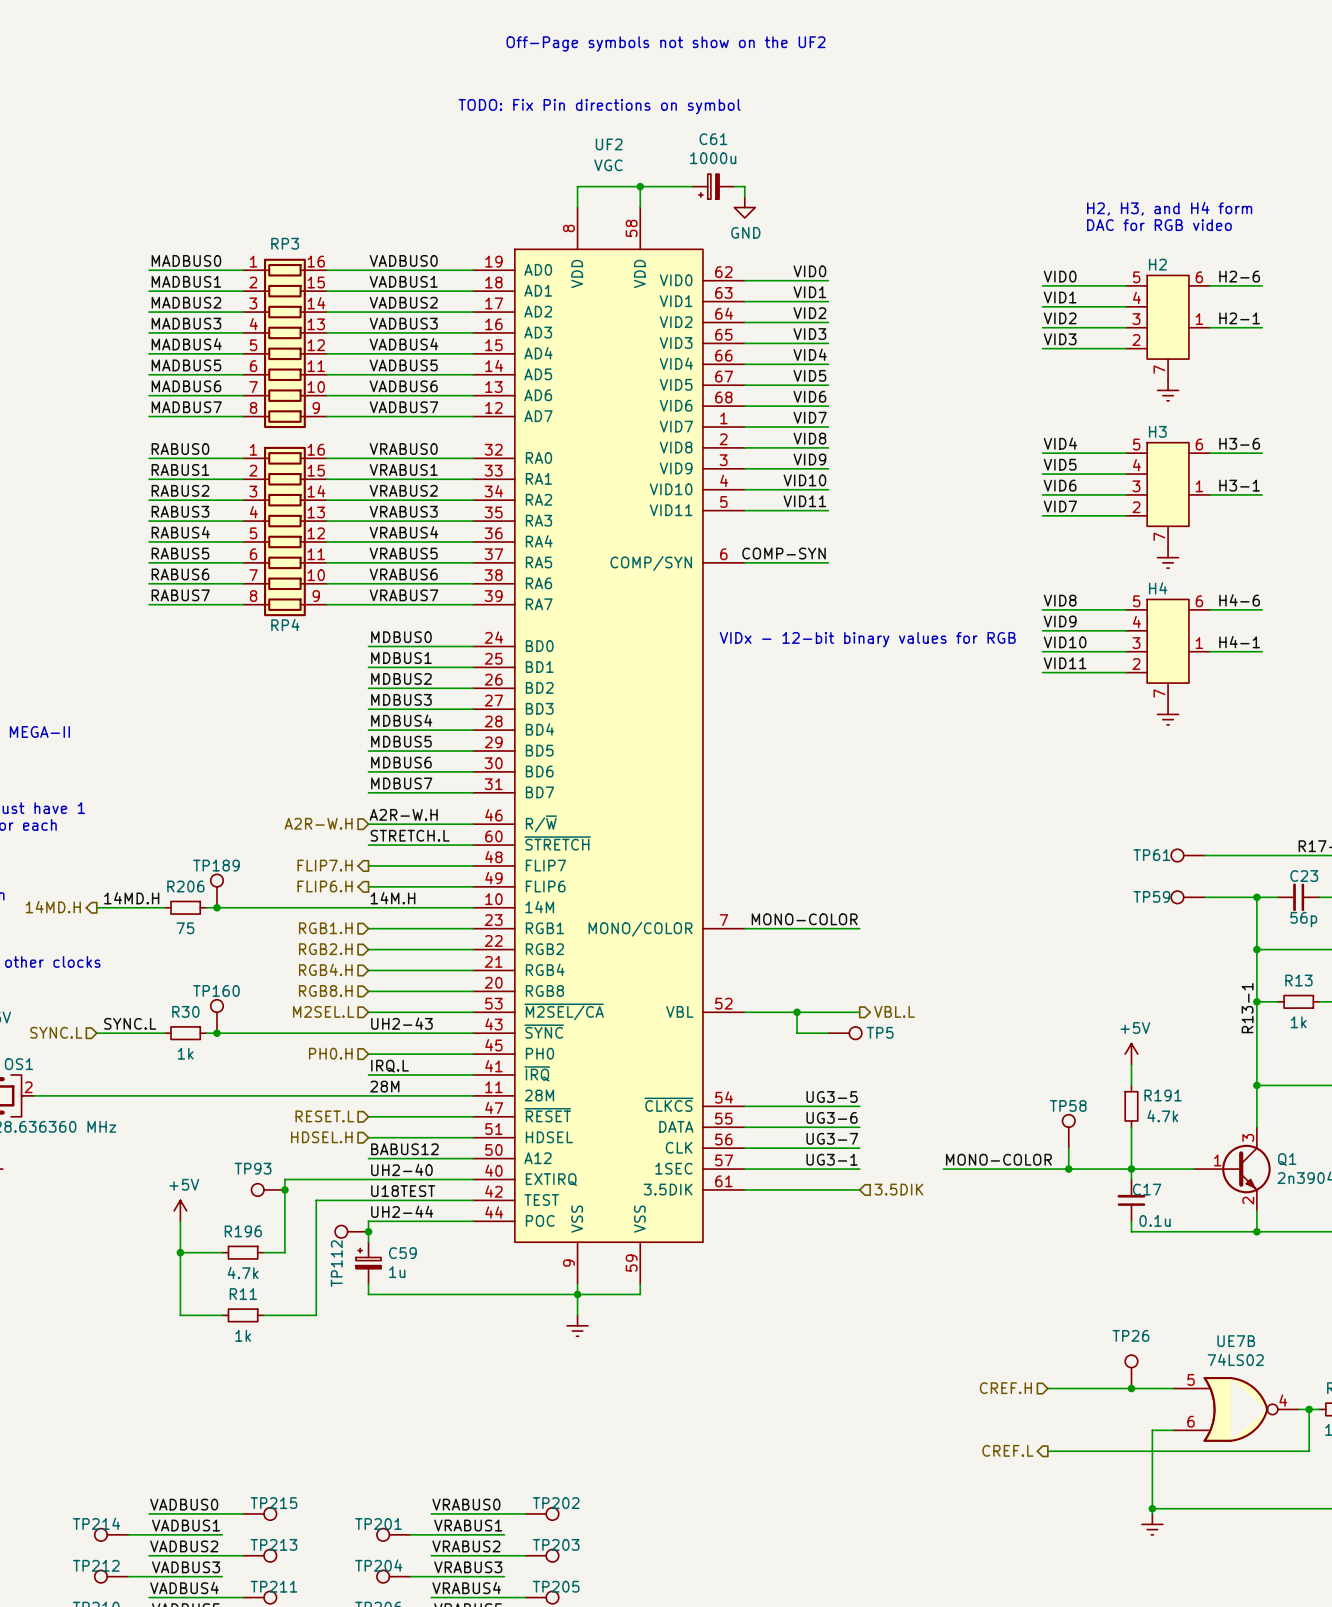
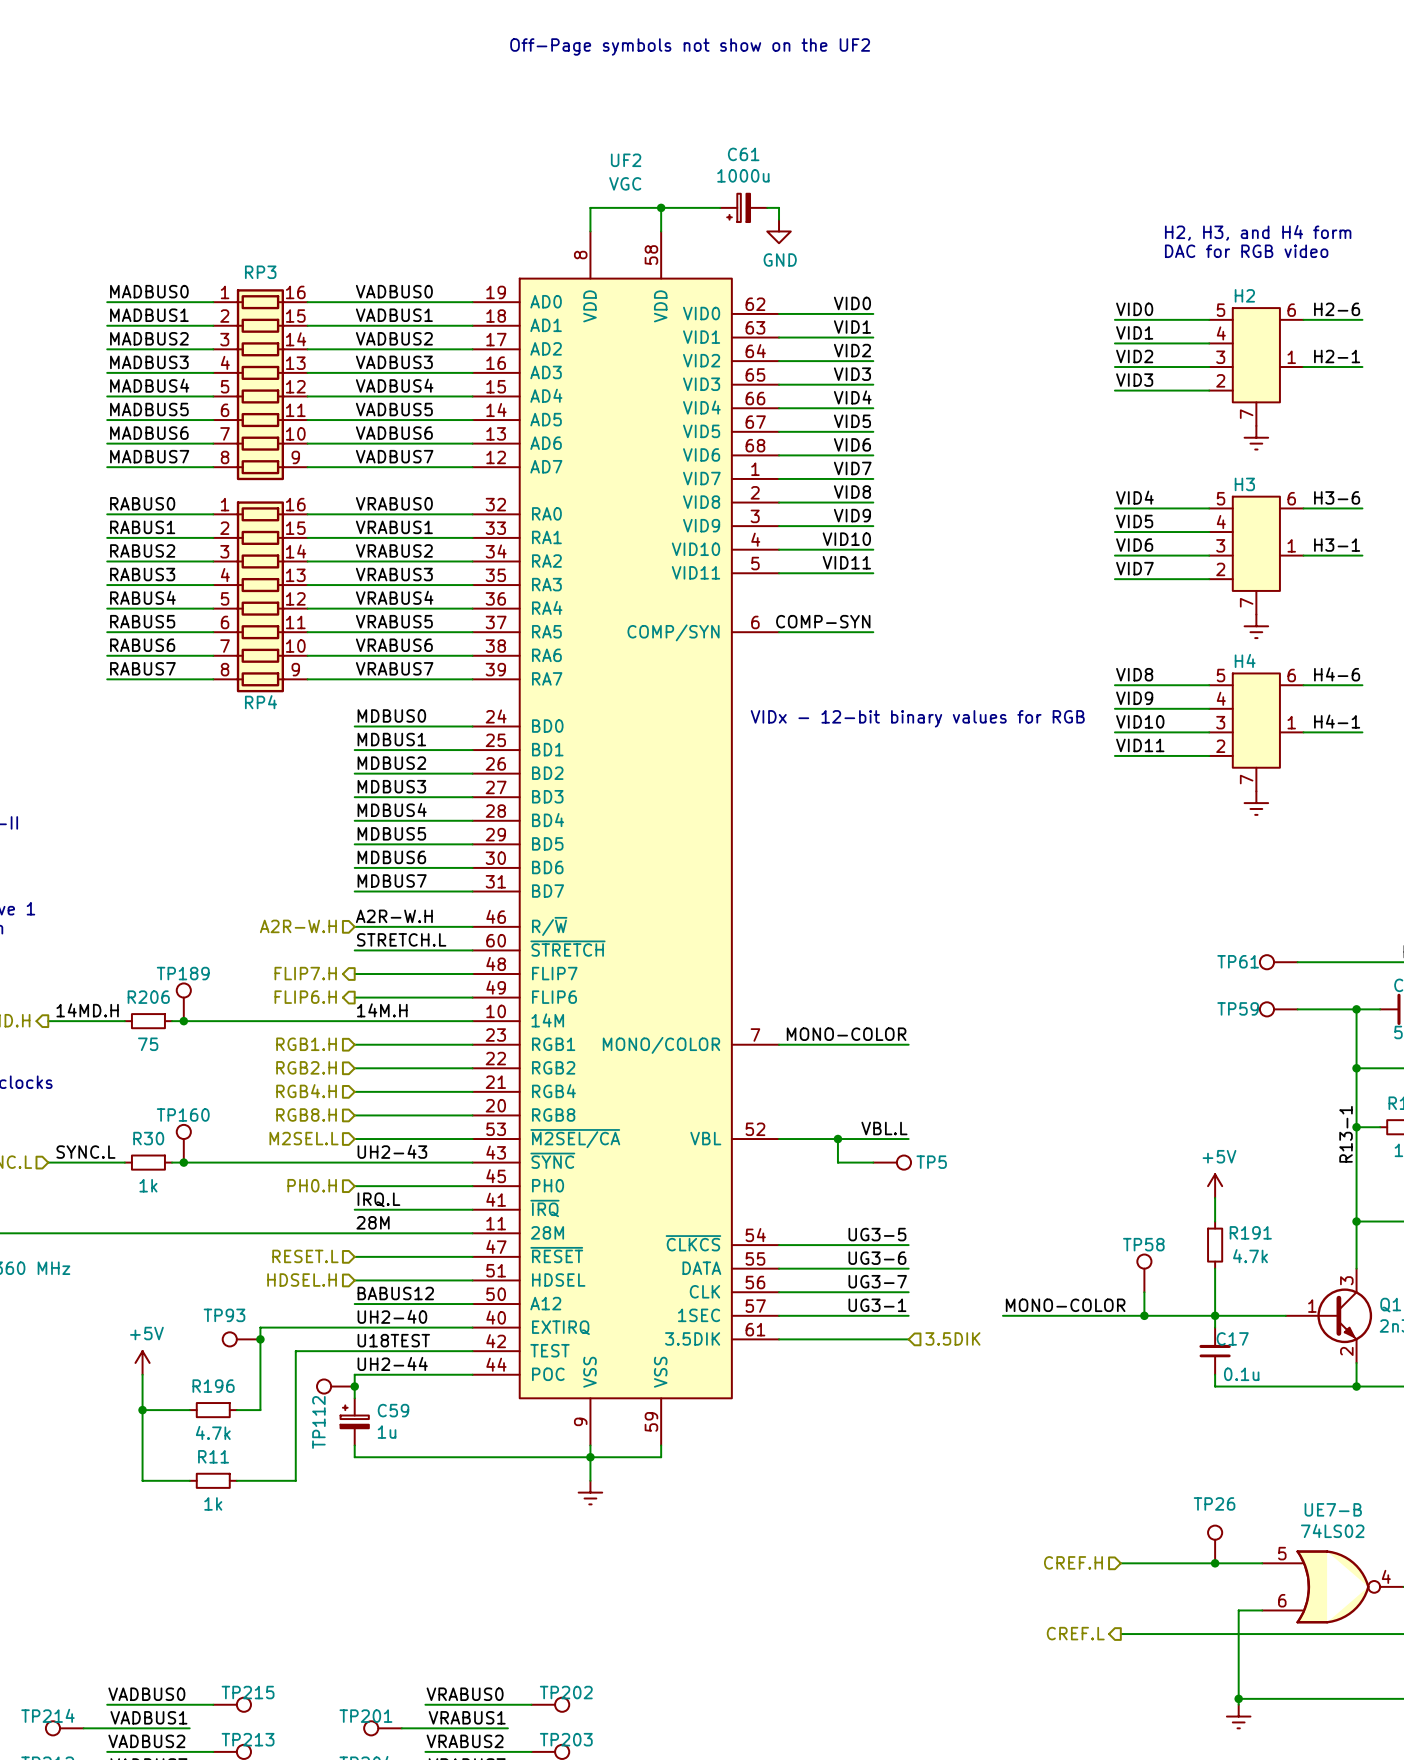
text: TODO: Fix Pin directions on symbol (599, 106) -> none
label: none -> VBL.L (884, 1128)
hierarchical label: VBL.L (894, 1011) -> none
UE7B name: UE7B (1236, 1341) -> UE7-B (1333, 1509)

